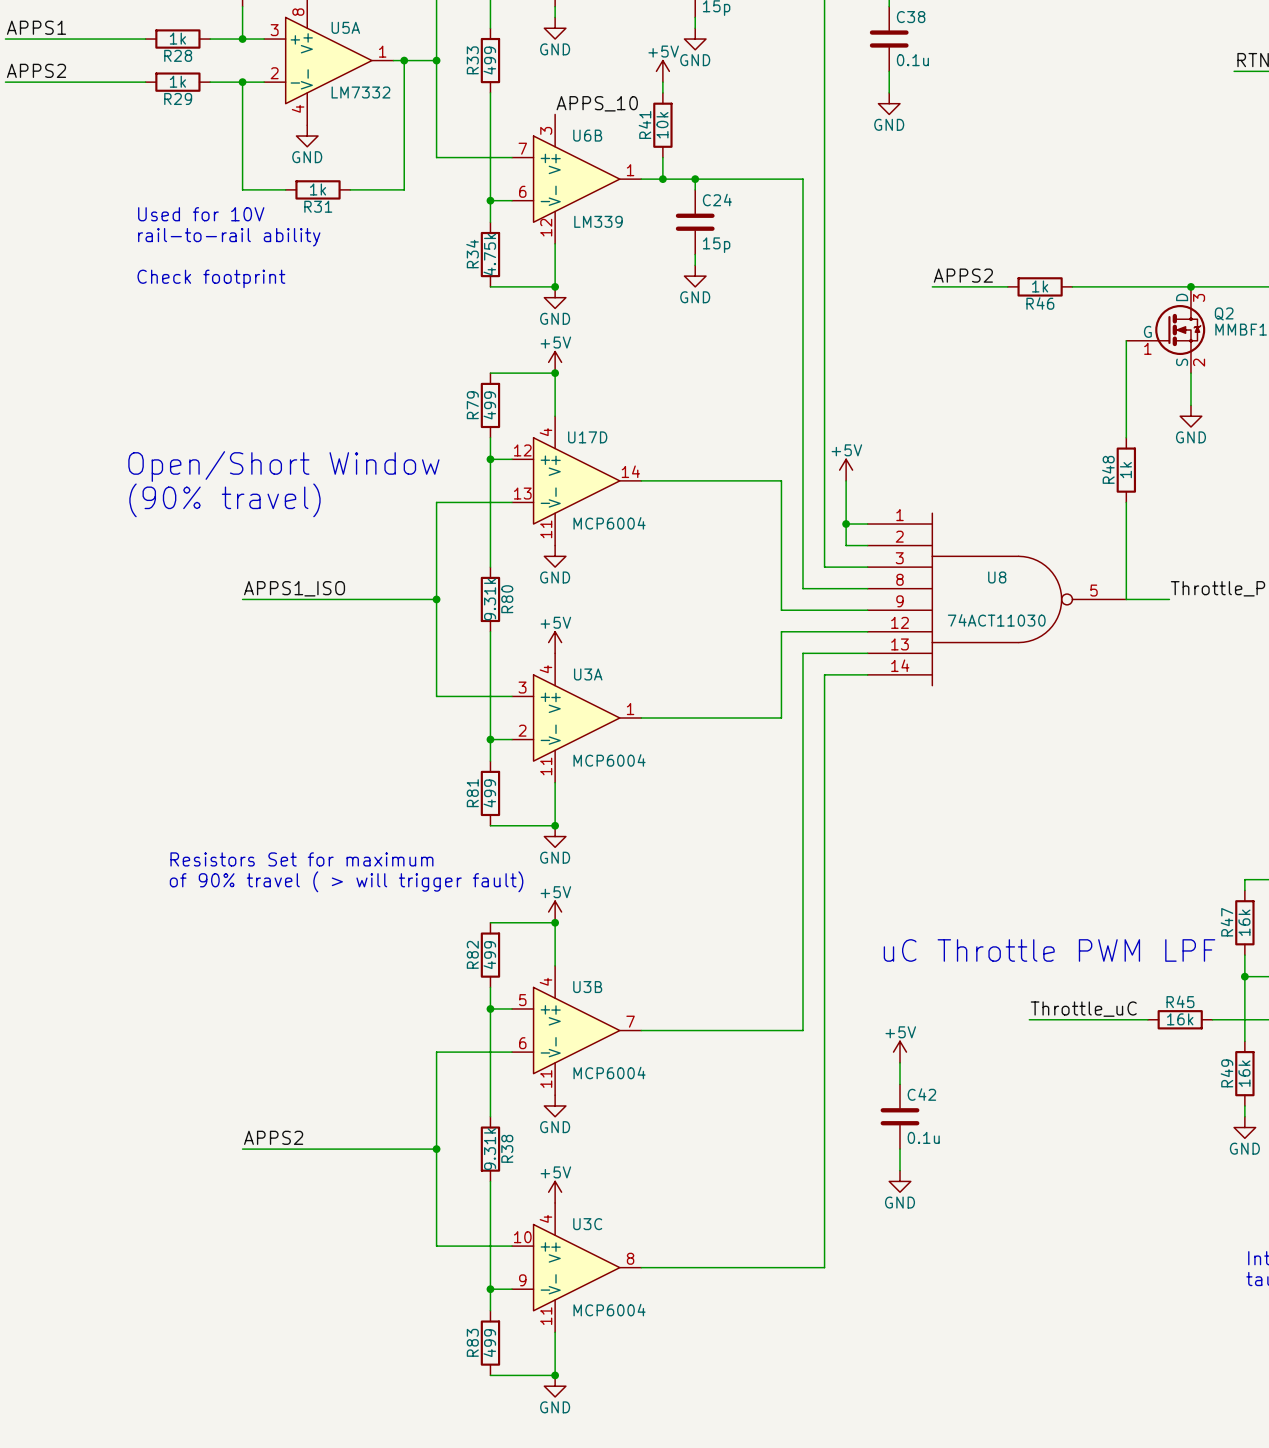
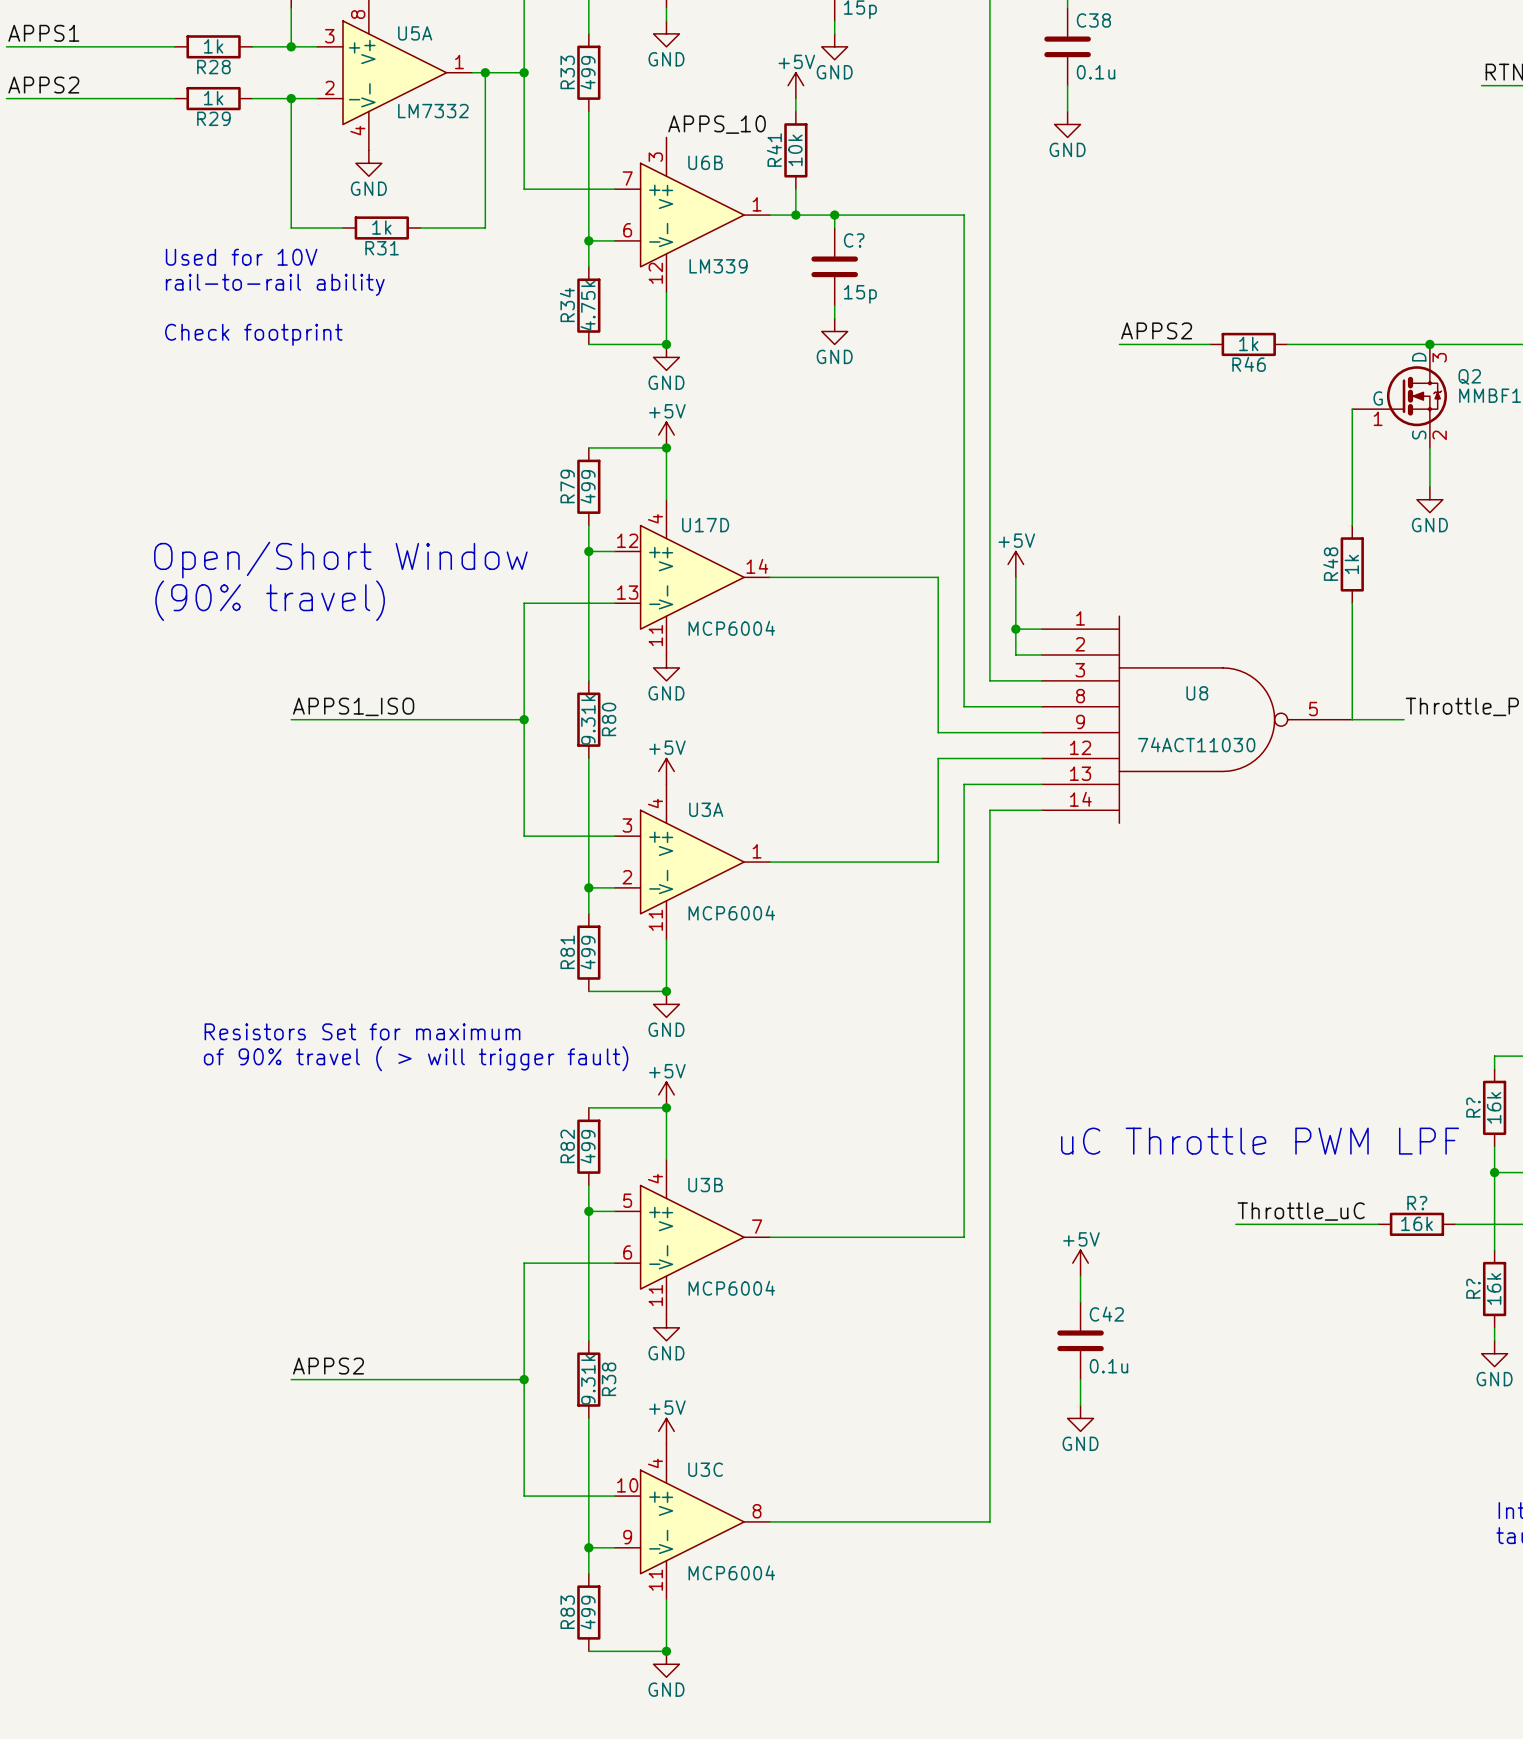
C24 name: C24 (717, 200) -> C? (854, 240)
R47 name: R47 (1226, 922) -> R? (1473, 1107)
R45 name: R45 (1180, 1001) -> R? (1417, 1203)
R49 name: R49 (1226, 1073) -> R? (1473, 1288)

